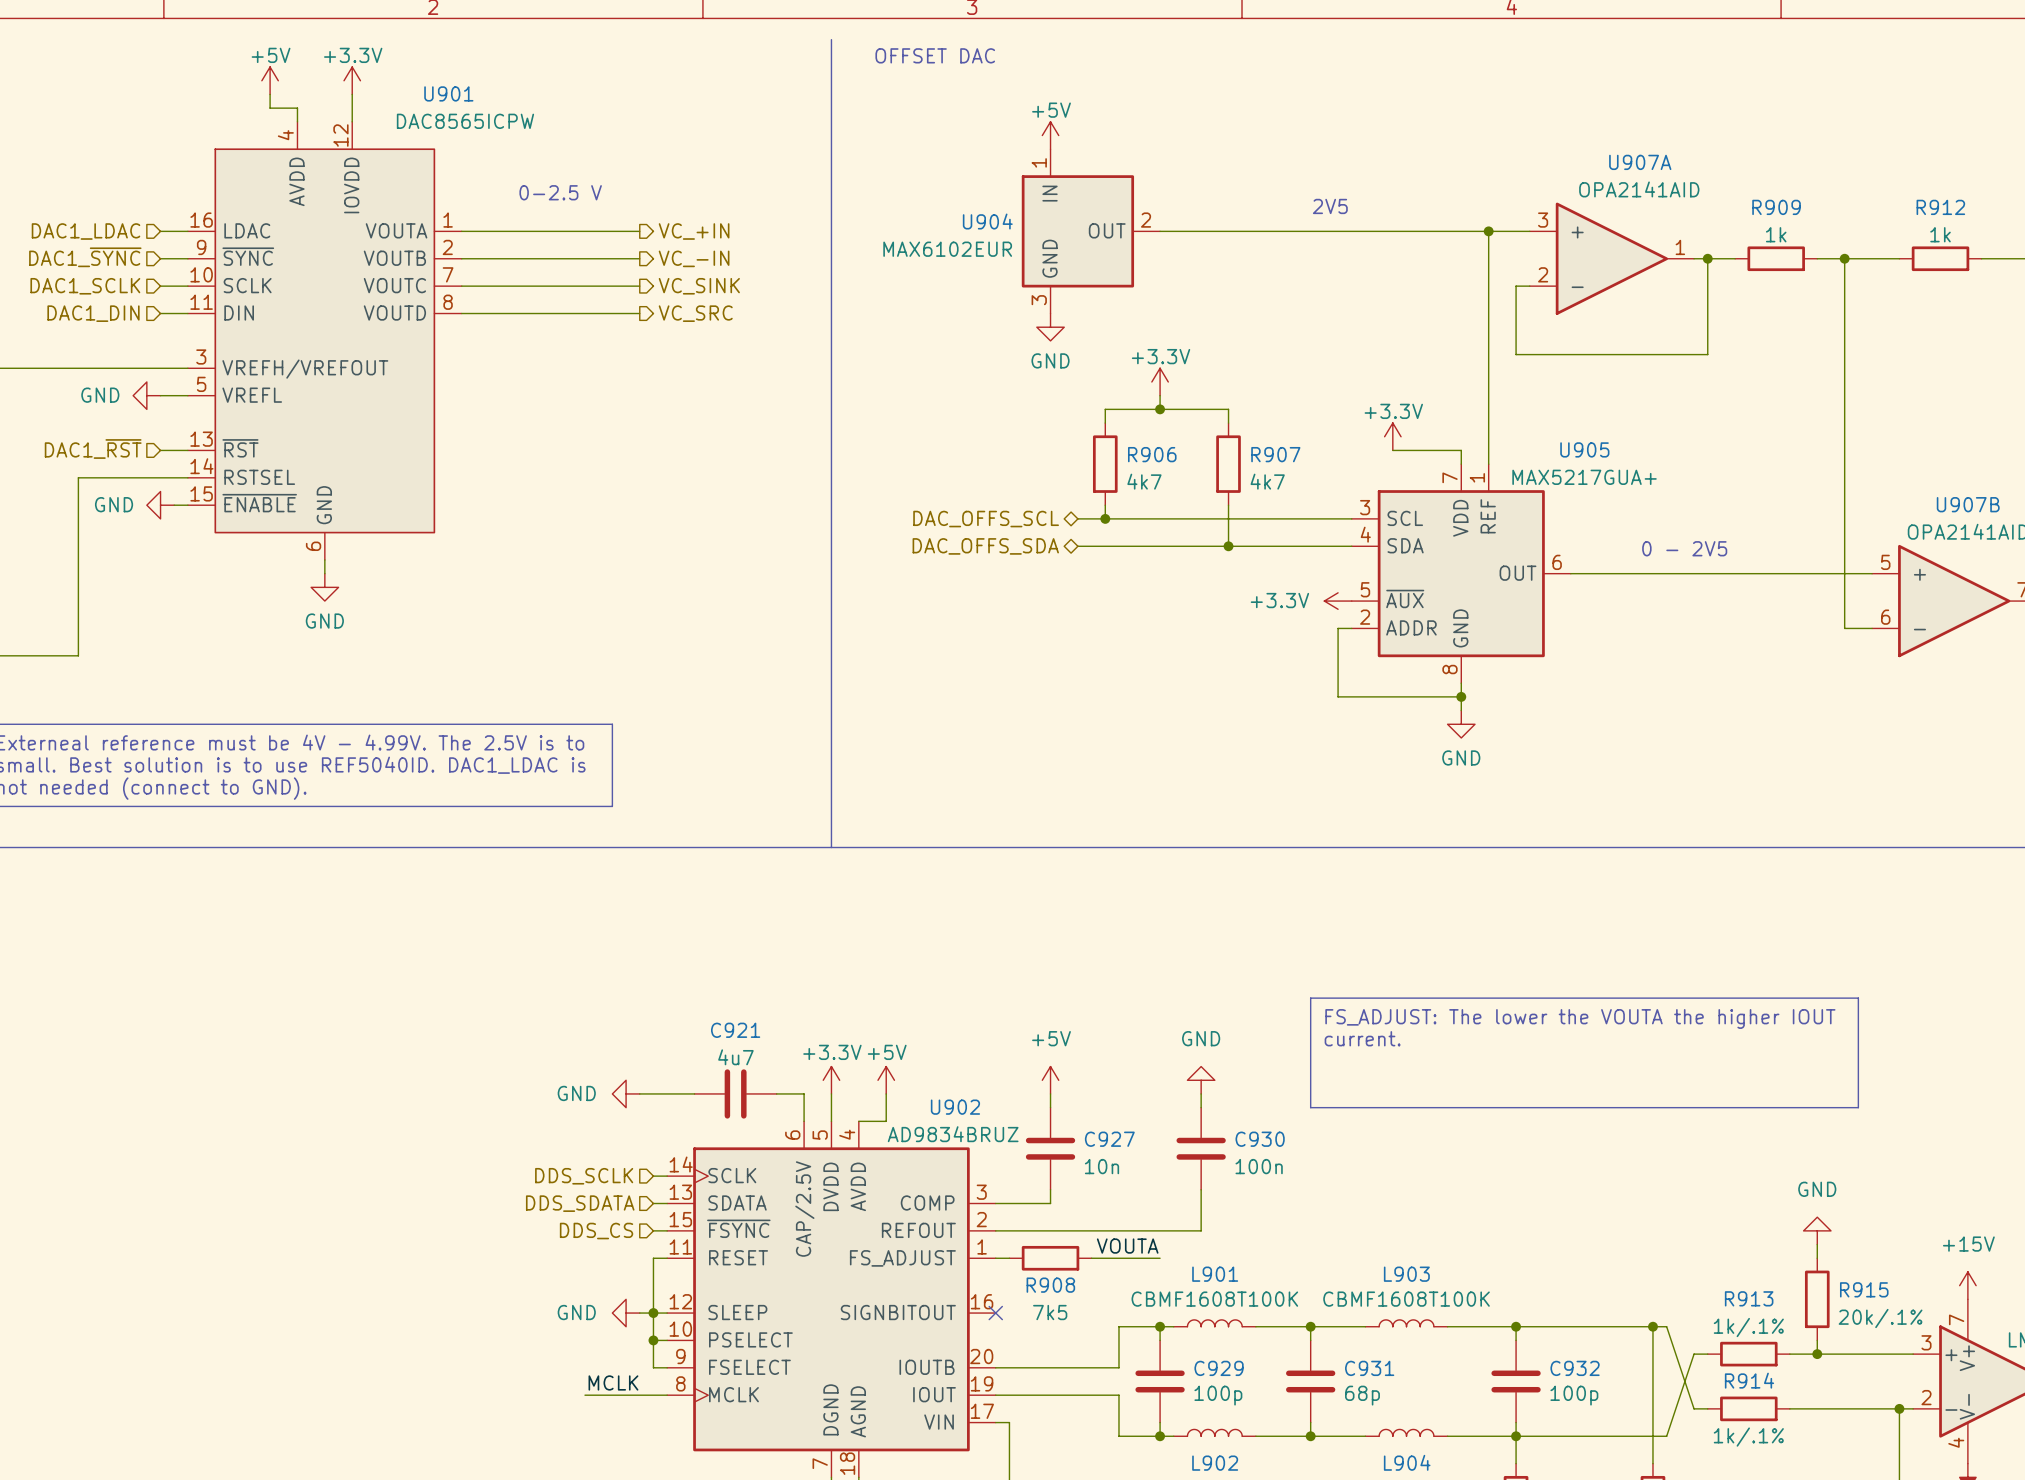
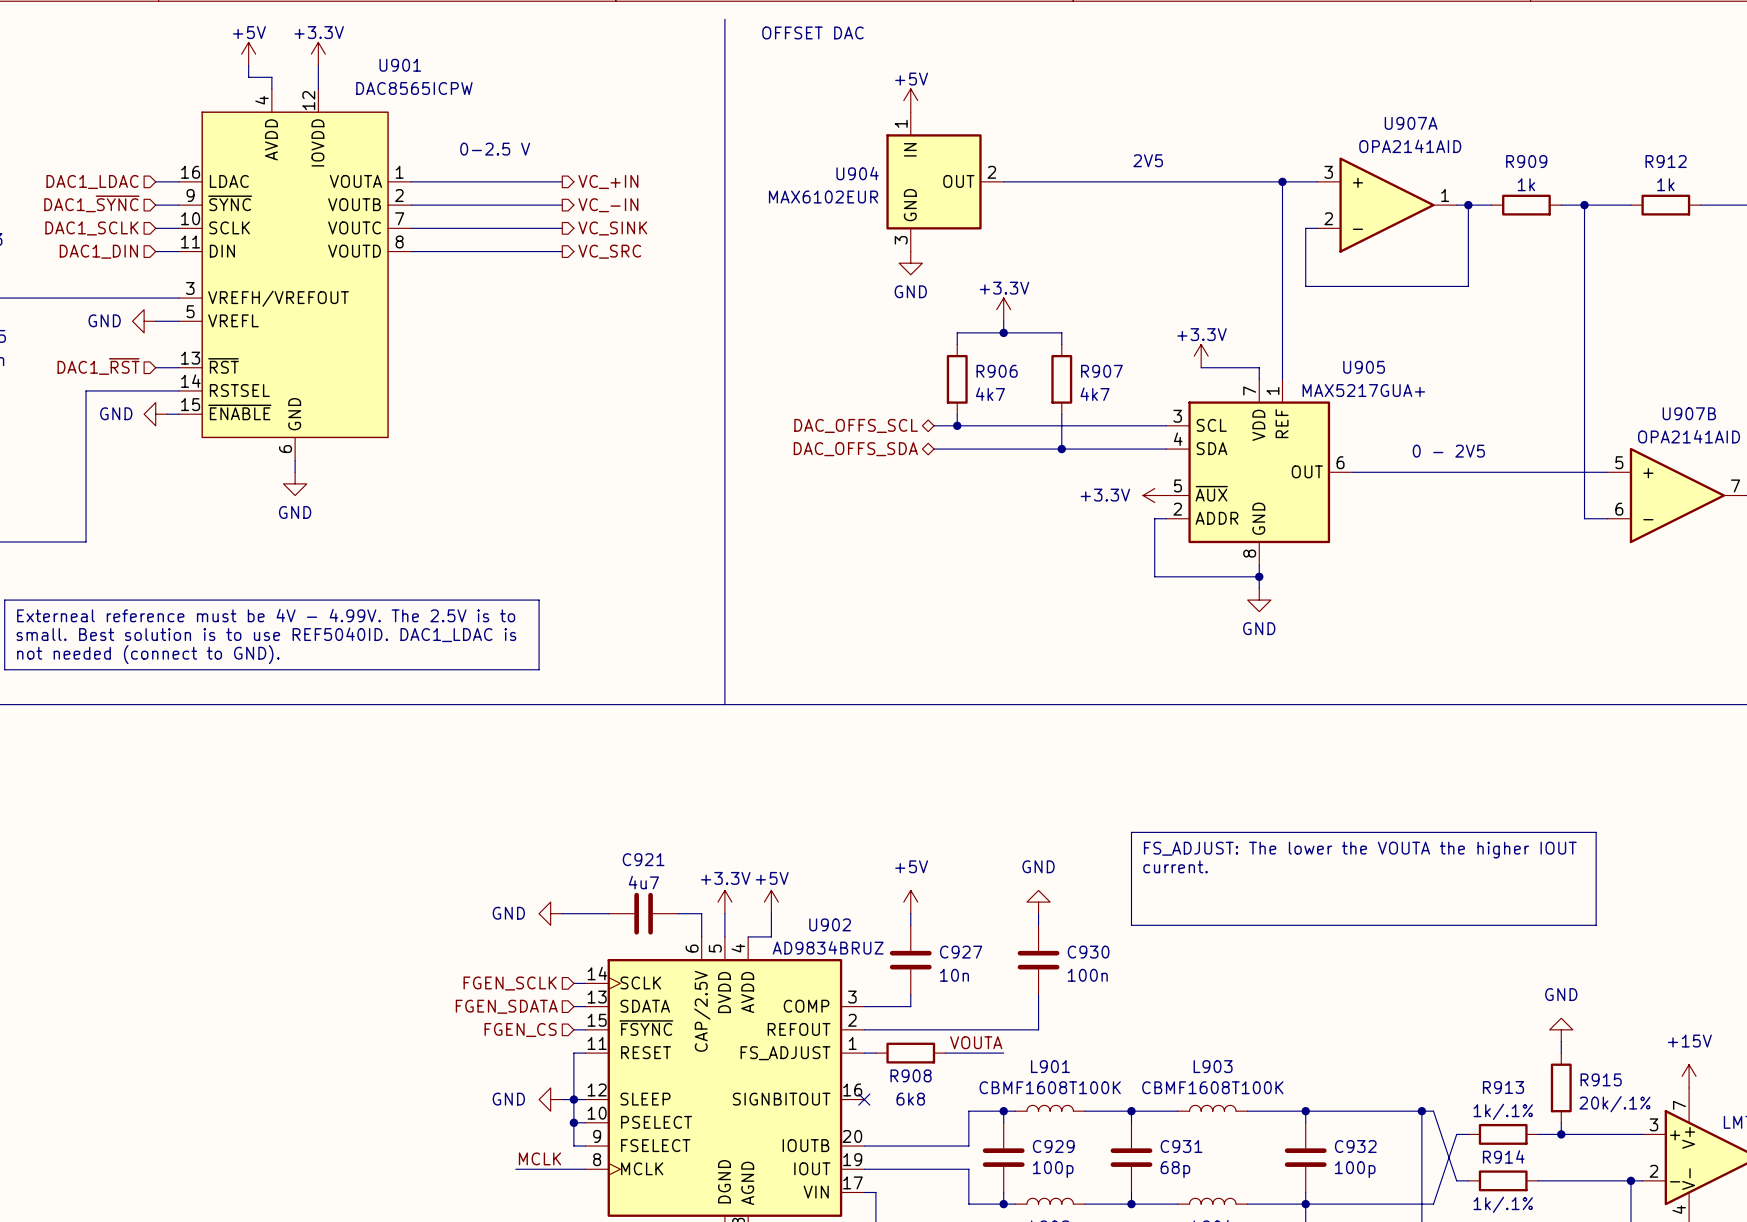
hierarchical label: DDS_SCLK (584, 1176) -> FGEN_SCLK (510, 983)
hierarchical label: DDS_SDATA (580, 1203) -> FGEN_SDATA (506, 1006)
hierarchical label: DDS_CS (596, 1231) -> FGEN_CS (520, 1029)
R908 value: 7k5 (1050, 1312) -> 6k8 (910, 1099)

